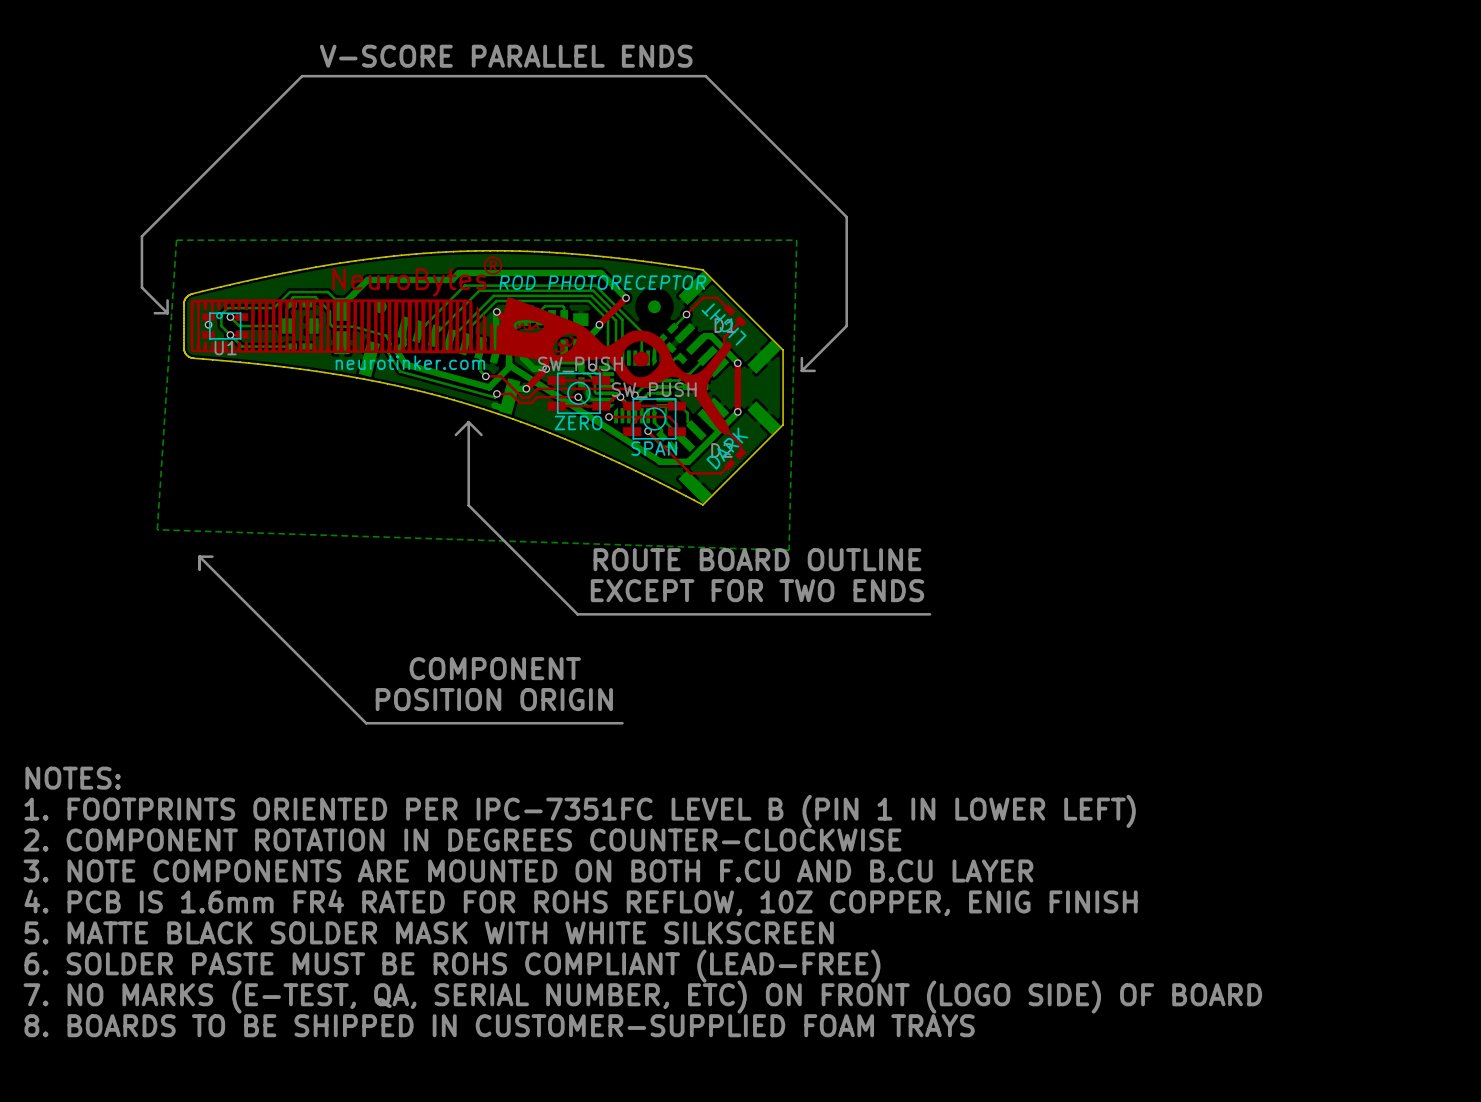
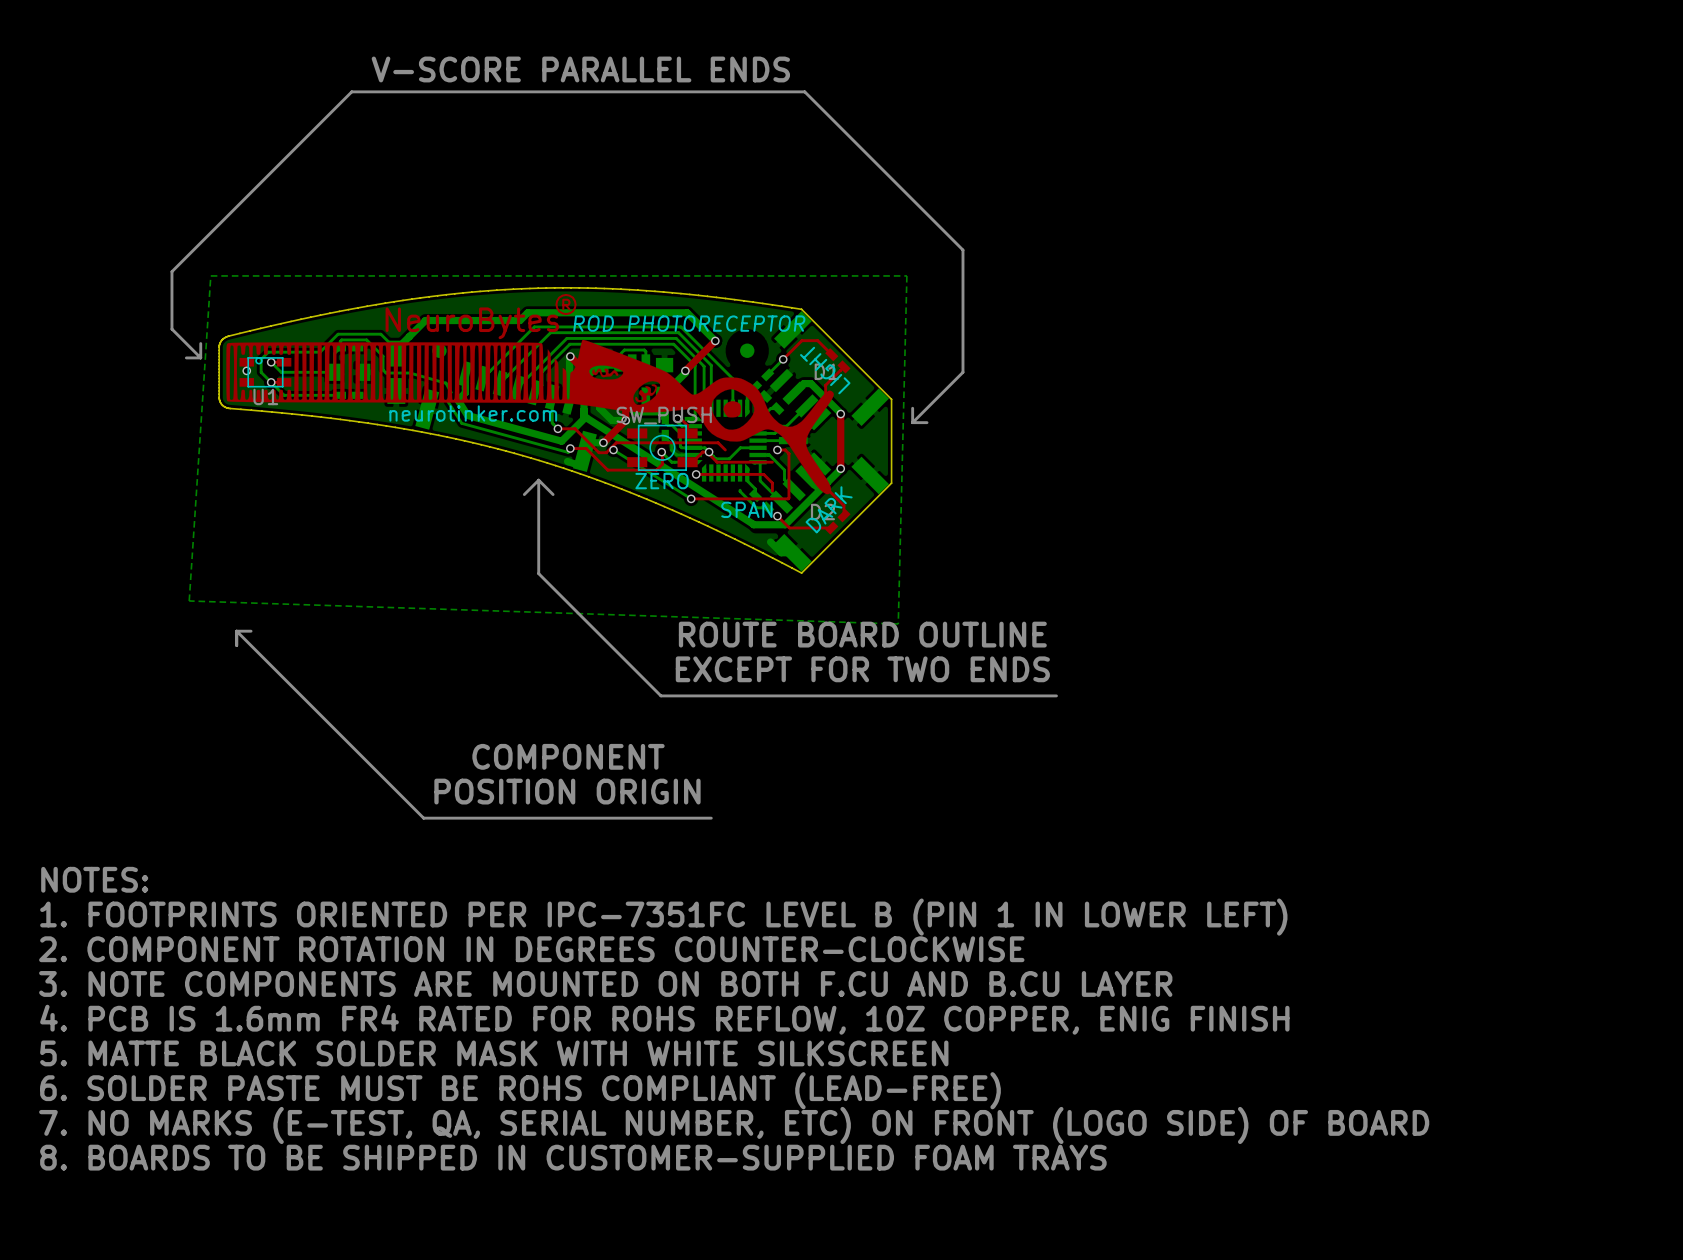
top track: (556, 380) (601, 380) -> none
bottom track: (664, 386) (643, 386) (634, 395) -> none
bottom track: none -> (613, 449) (691, 498)
via: none -> (613, 449)
via: (634, 395) -> none
top track: none -> (777, 449) (785, 449) (788, 453) (788, 498) (691, 498)
via: none -> (777, 449)
top track: (578, 397) (537, 397) (531, 402) (519, 402) -> (662, 449) (662, 464) (656, 470) (607, 470) (596, 458)
top track: (556, 406) (601, 406) -> none
top track: (639, 417) (632, 424) (632, 431) (627, 431) -> none
part: SW_PUSH (654, 418) -> none
top track: (648, 431) (690, 473) (721, 473) (729, 464) -> (777, 516) (789, 527) (831, 527)
via: (648, 431) -> none
via: none -> (691, 498)
via: none -> (777, 516)
bottom track: none -> (770, 542) (781, 552) (792, 552)

